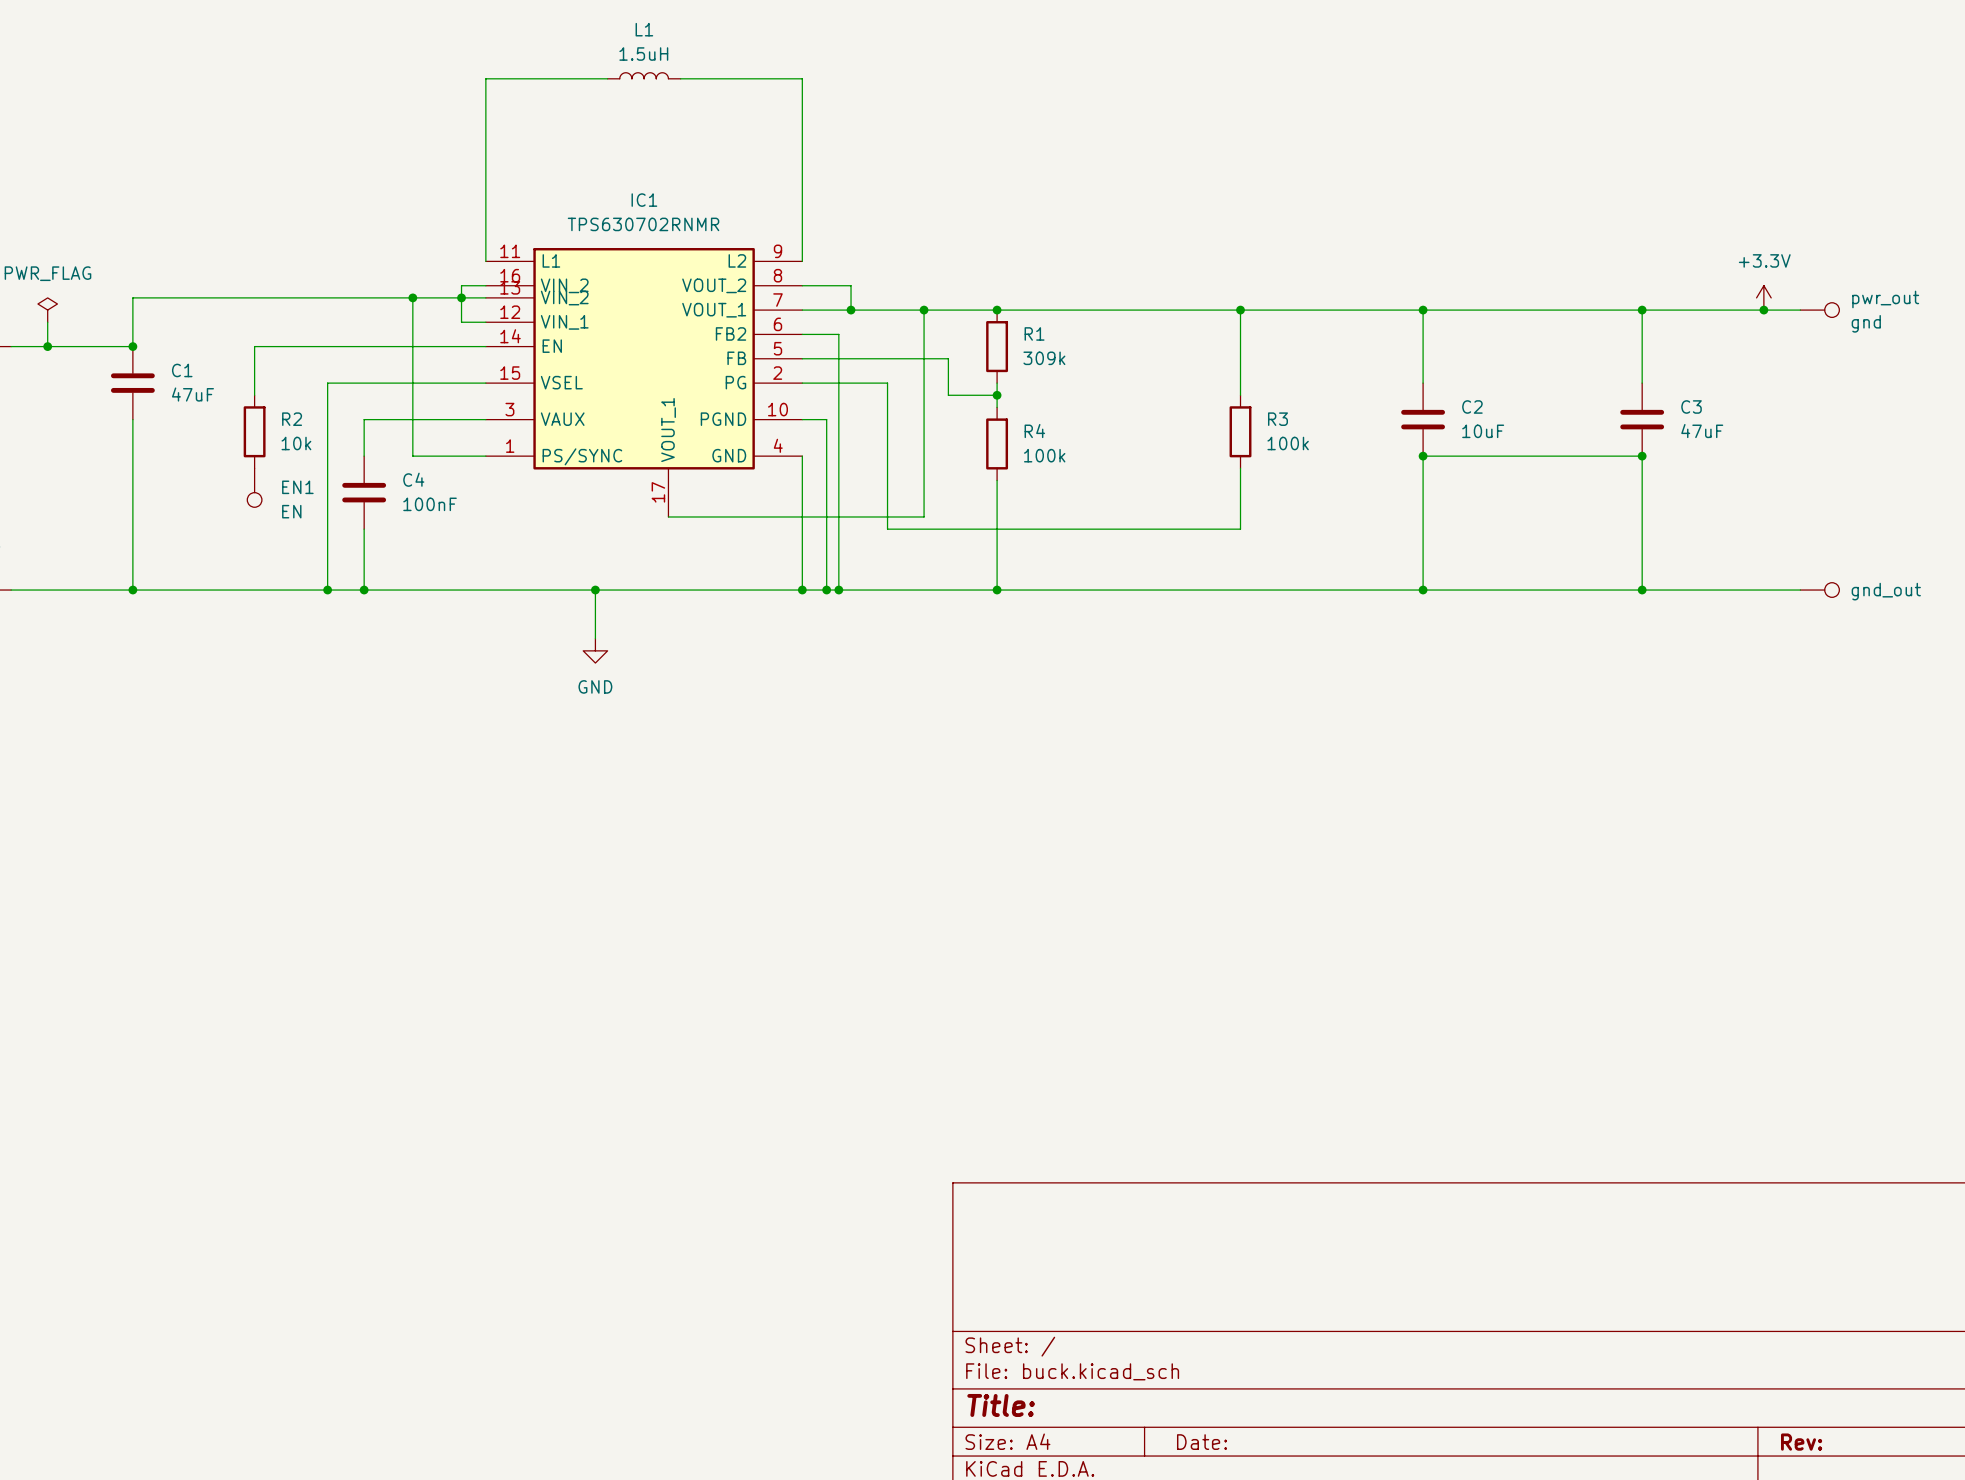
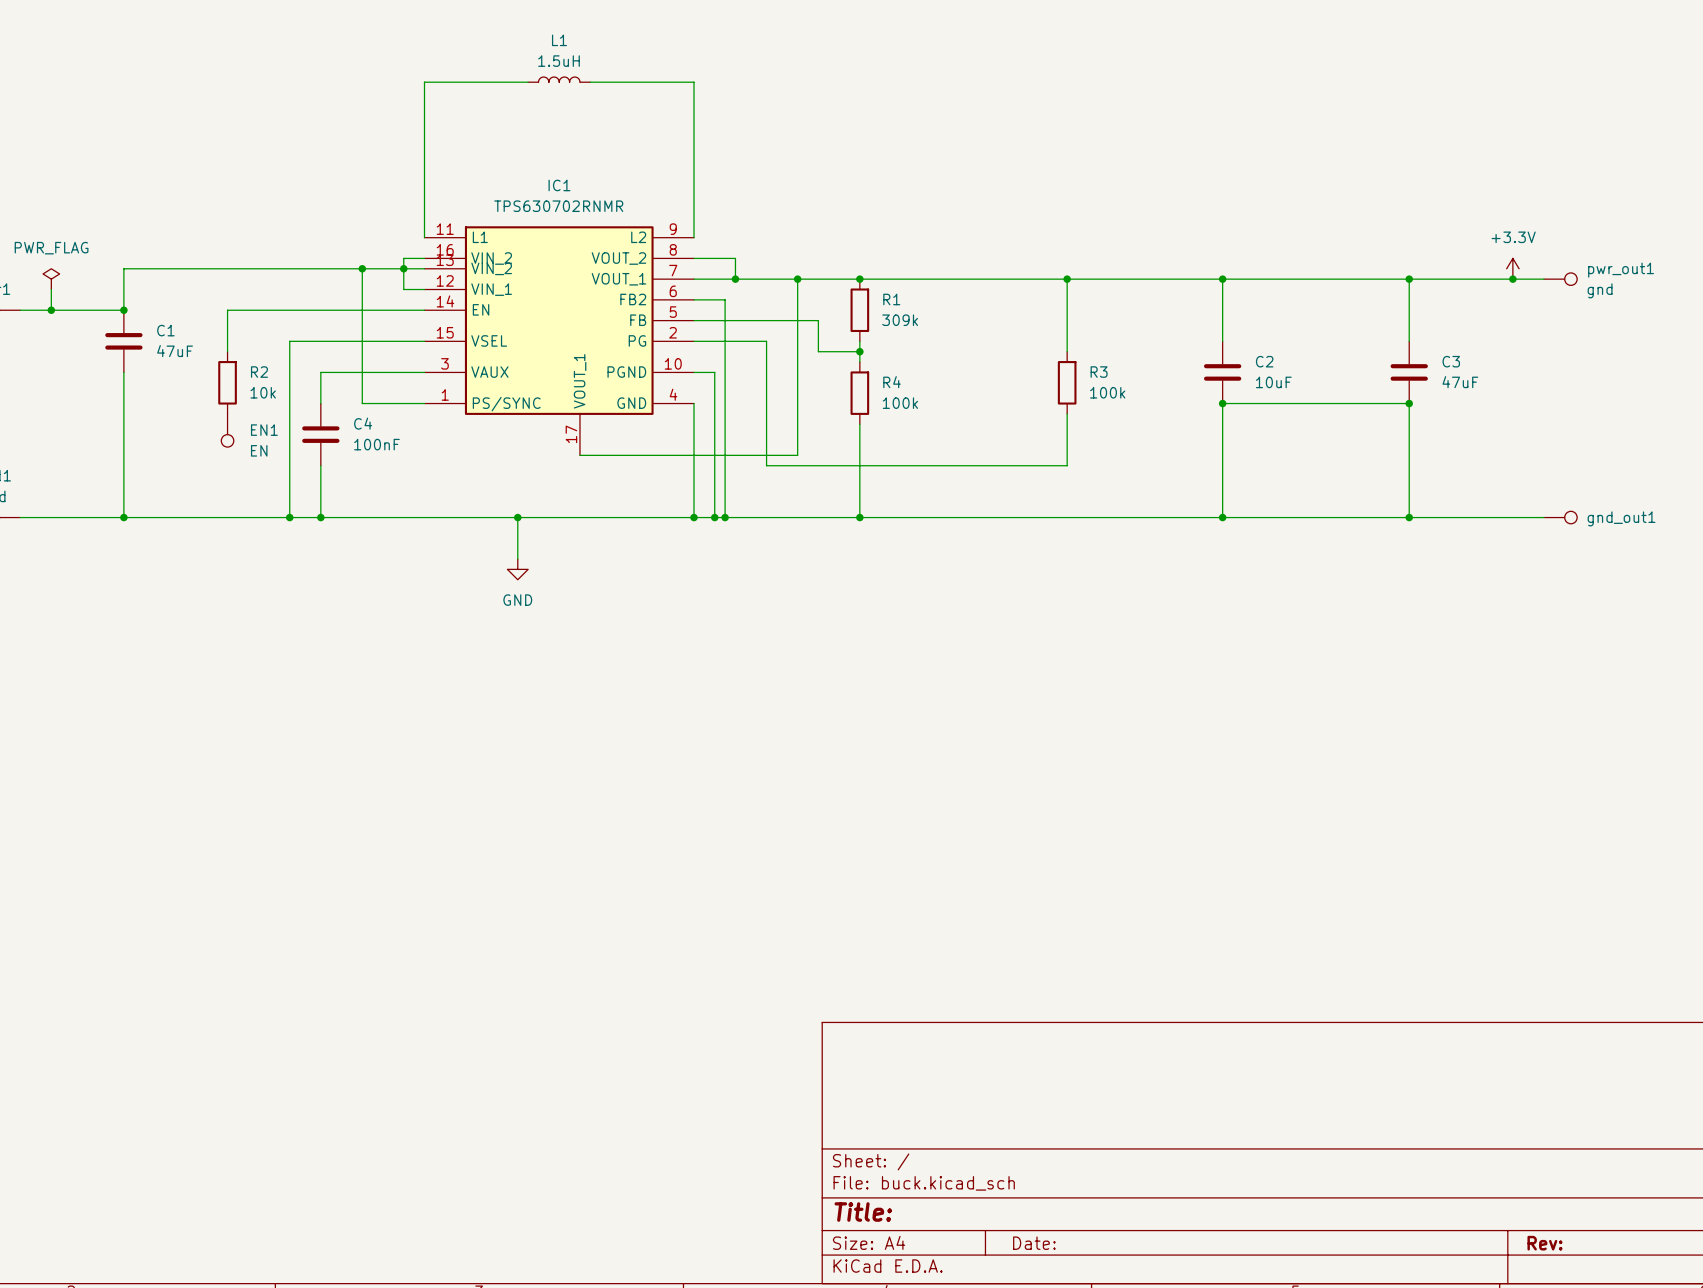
pwr_out name: pwr_out (1885, 299) -> pwr_out1 (1621, 270)
gnd_out name: gnd_out (1886, 591) -> gnd_out1 (1621, 518)

